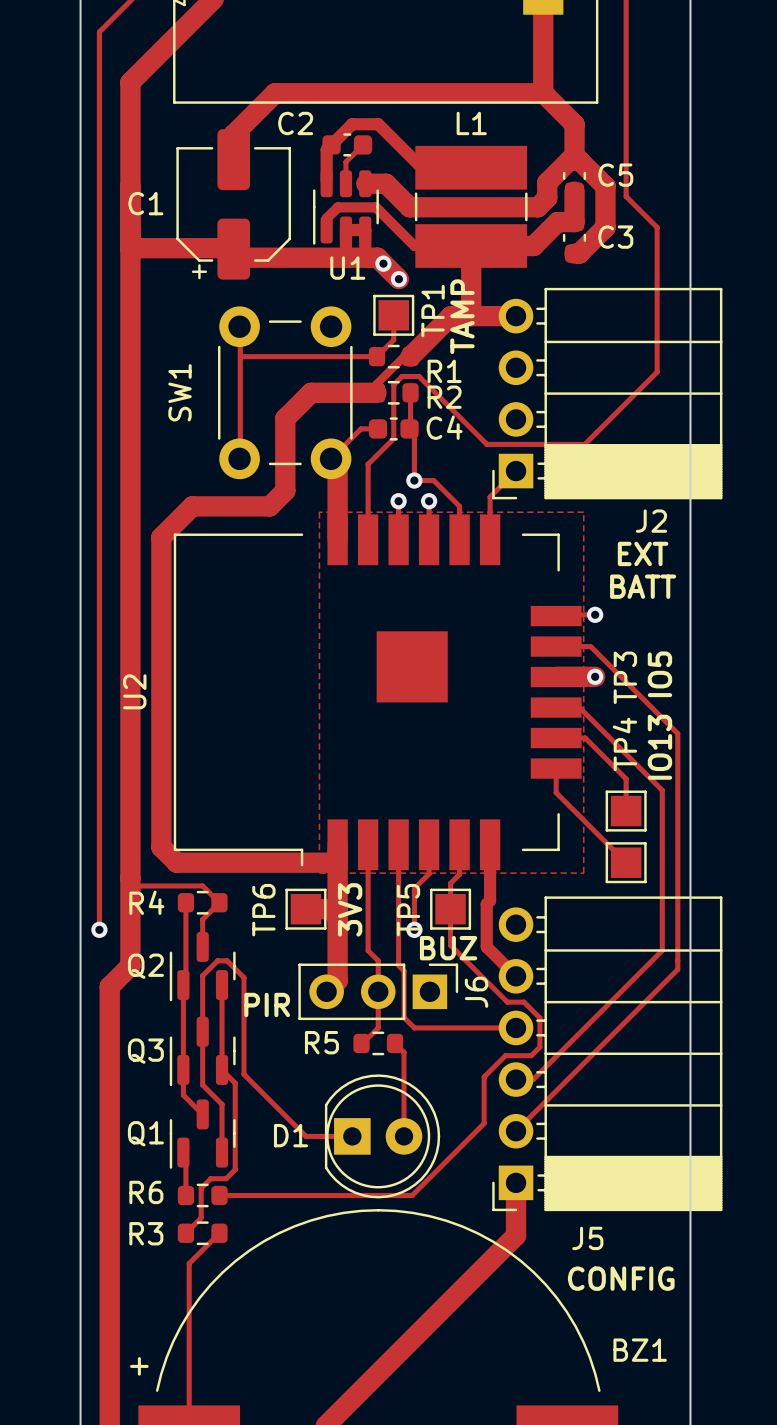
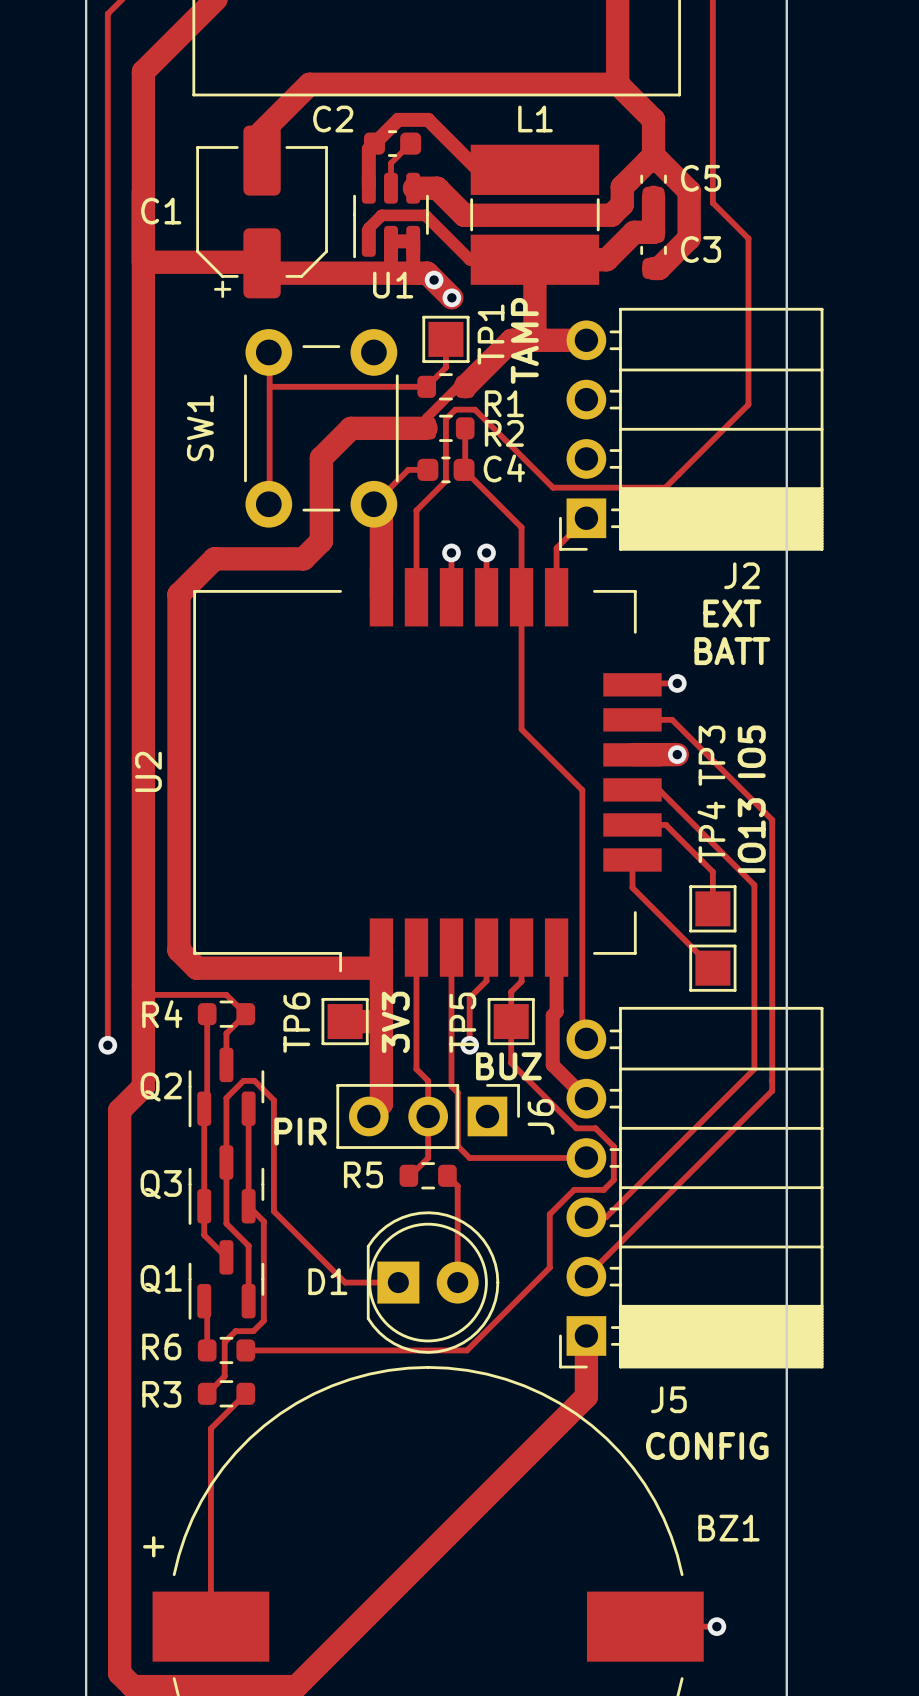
track: (414, 433) (414, 480) (433, 480) (459, 506) -> (469, 475) (521, 527) (521, 558)
via: (414, 480) -> none
zone outline: (319, 512) (319, 873) (583, 873) (583, 512) (319, 512) -> none
U2 footprint: [173, 514, 582, 871] -> [193, 568, 662, 977]
track: none -> (521, 597) (521, 729) (582, 790) (582, 1035) (586, 1039)

